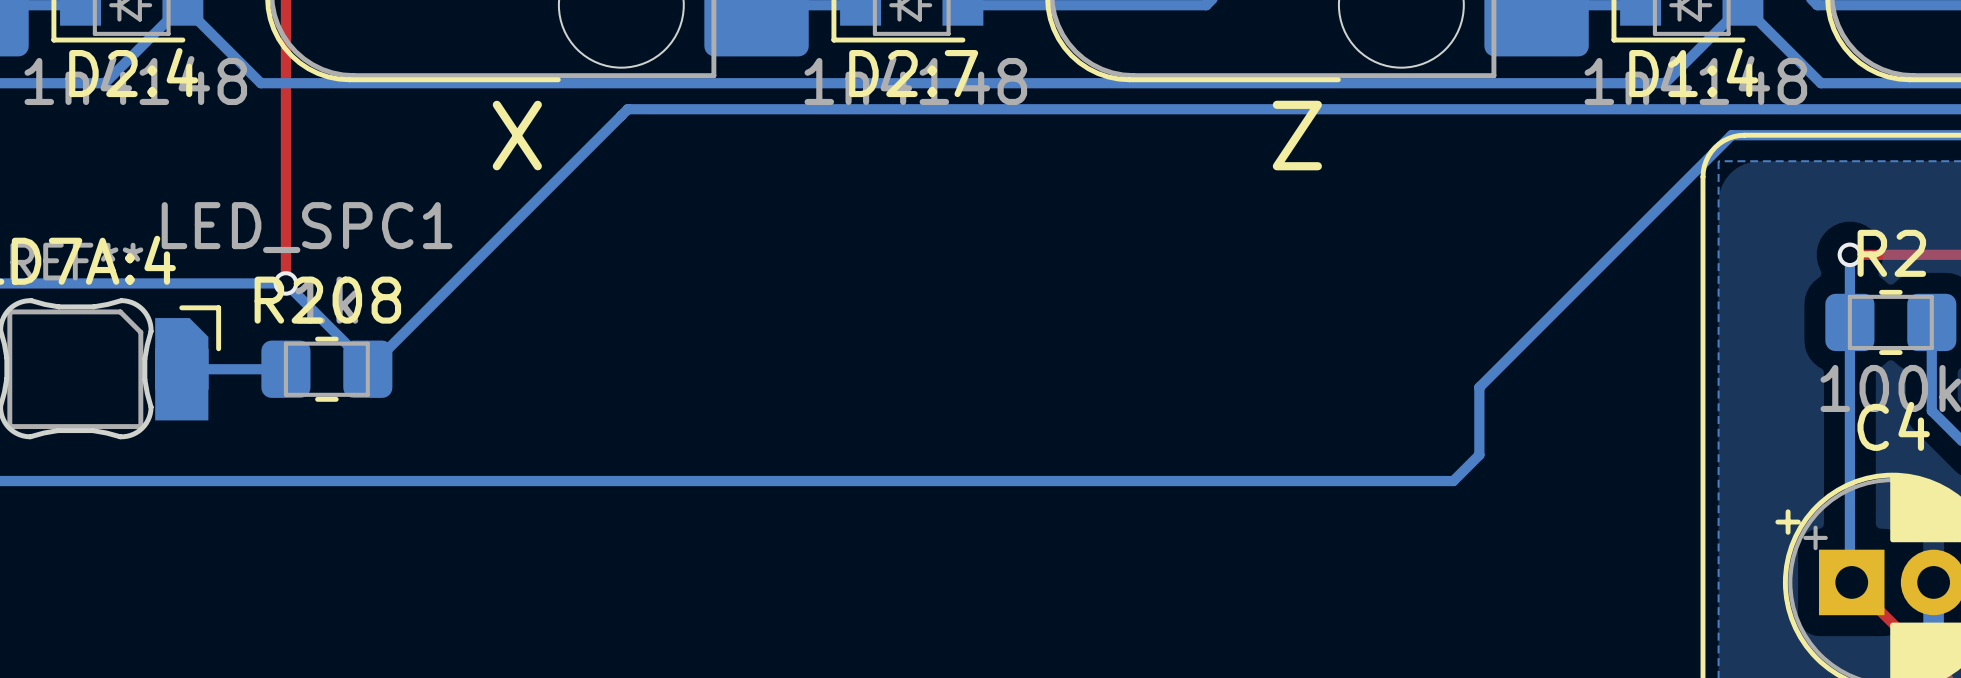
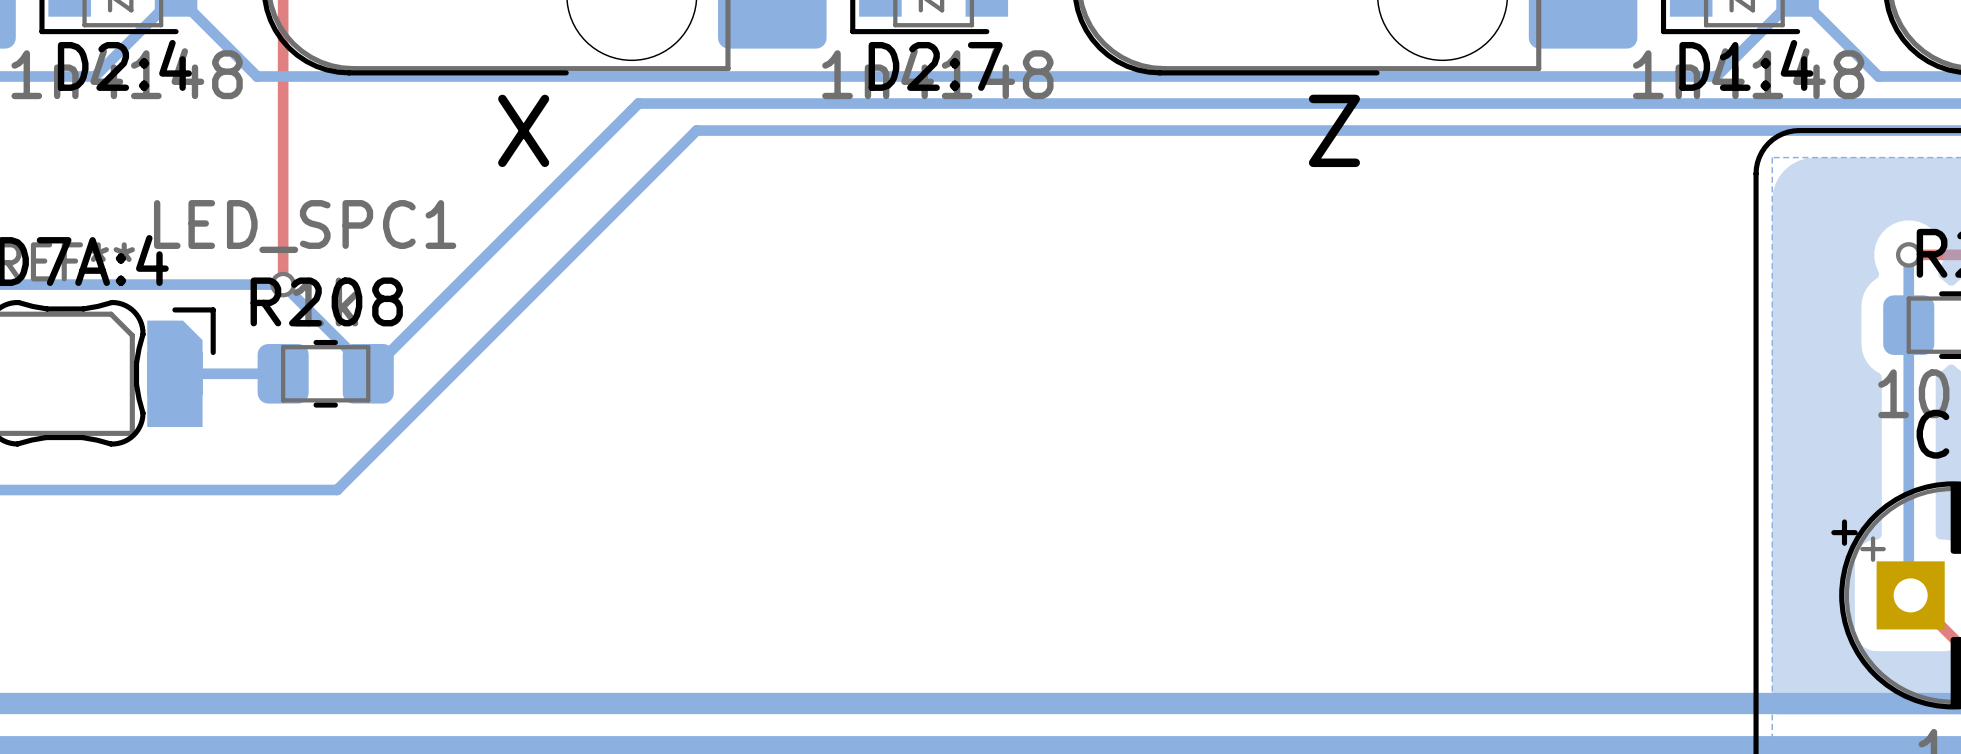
bottom track: (1731, 135) (1479, 387) (1479, 455) (1453, 481) (337, 481) -> (1785, 130) (696, 130) (337, 489)

